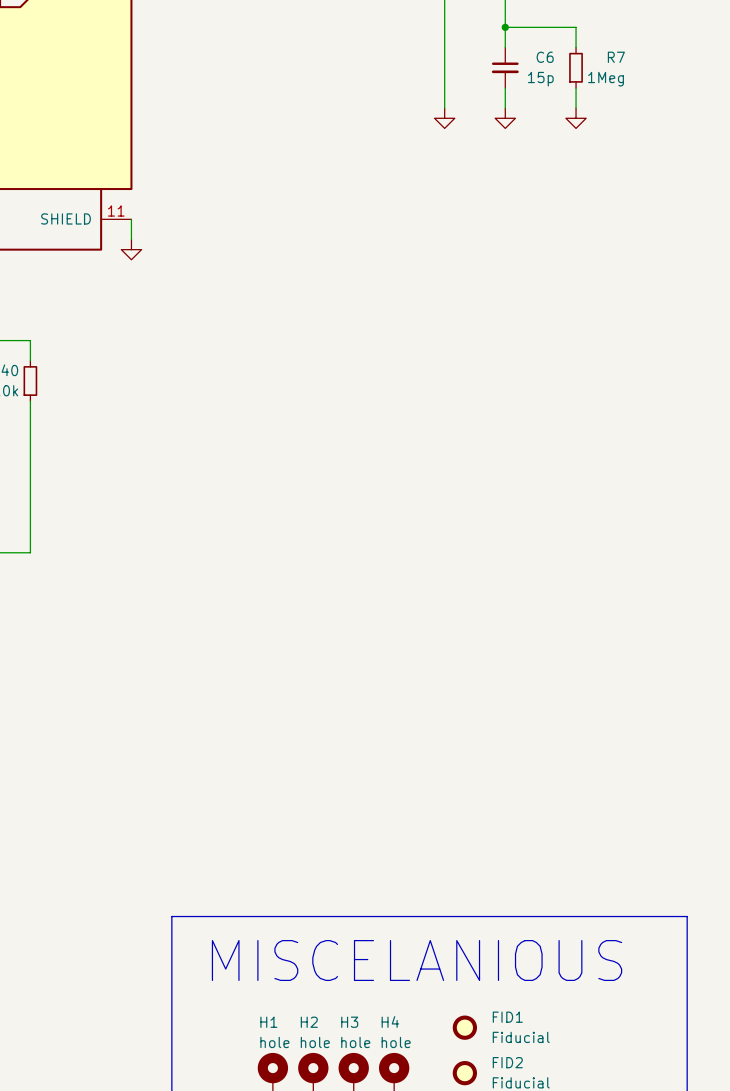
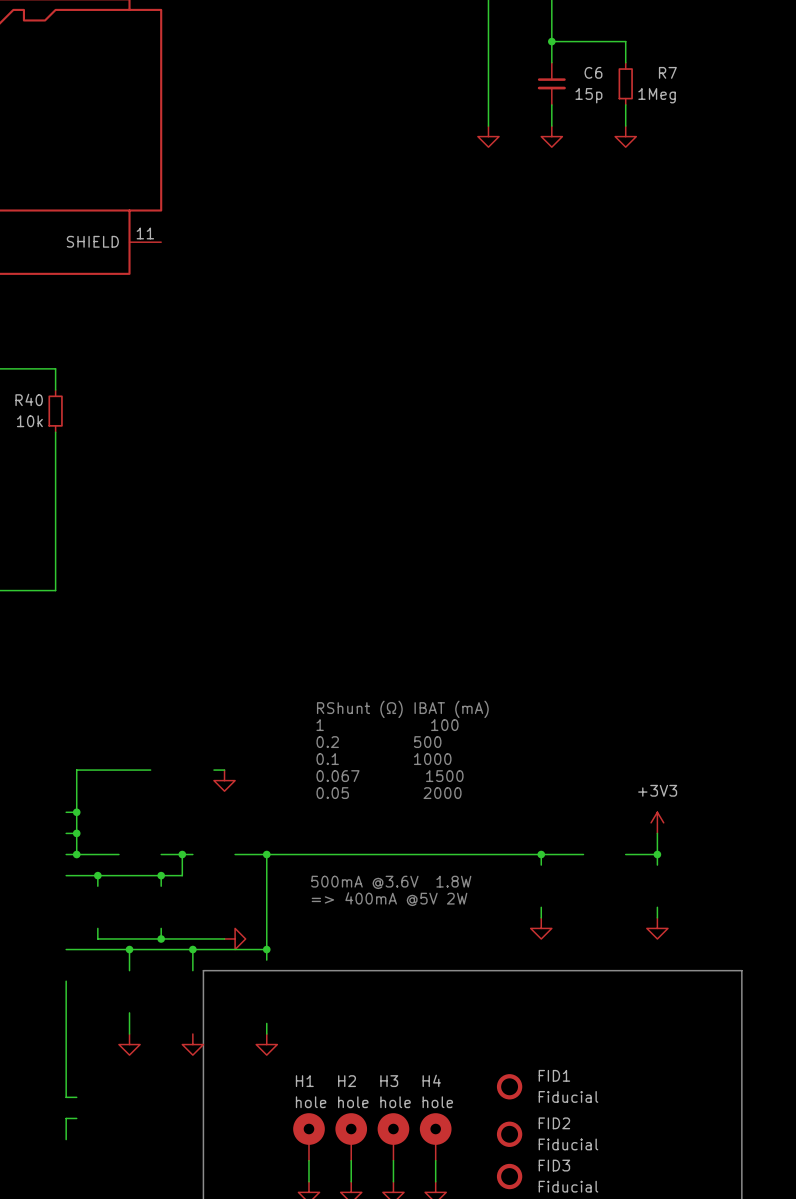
wire: (131, 219) (131, 239) -> none
power symbol: (131, 249) -> none
text: none -> RShunt (Ω) IBAT (mA) (402, 709)
text: none -> 1 100 (387, 725)
text: none -> 0.2 500 (378, 742)
text: none -> 0.1 1000 (383, 759)
wire: none -> (150, 770) (76, 770) (76, 854)
wire: none -> (213, 770) (224, 770)
text: none -> 0.067 1500 (390, 776)
power symbol: none -> (224, 780)
text: none -> 0.05 2000 (389, 793)
wire: none -> (66, 812) (76, 812)
junction: none -> (76, 812)
power symbol: none -> +3V3 (657, 822)
wire: none -> (66, 833) (76, 833)
junction: none -> (76, 833)
wire: none -> (657, 833) (657, 865)
wire: none -> (66, 854) (118, 854)
junction: none -> (76, 854)
wire: none -> (161, 854) (192, 854)
wire: none -> (182, 854) (182, 875) (66, 875)
junction: none -> (182, 854)
wire: none -> (235, 854) (583, 854)
wire: none -> (266, 854) (266, 960)
junction: none -> (266, 854)
wire: none -> (541, 854) (541, 865)
junction: none -> (541, 854)
wire: none -> (625, 854) (657, 854)
junction: none -> (657, 854)
wire: none -> (97, 875) (97, 886)
junction: none -> (97, 875)
wire: none -> (161, 875) (161, 886)
junction: none -> (161, 875)
text: none -> 500mA @3.6V 1.8W (391, 882)
text: none -> => 400mA @5V 2W (389, 899)
wire: none -> (541, 907) (541, 917)
wire: none -> (657, 907) (657, 917)
wire: none -> (97, 928) (97, 938) (224, 938)
wire: none -> (161, 928) (161, 938)
power symbol: none -> (541, 928)
power symbol: none -> (657, 928)
junction: none -> (161, 938)
power symbol: none -> (235, 938)
wire: none -> (66, 949) (266, 949)
wire: none -> (129, 949) (129, 970)
junction: none -> (129, 949)
wire: none -> (192, 949) (192, 970)
junction: none -> (192, 949)
junction: none -> (266, 949)
wire: none -> (66, 981) (66, 1097) (76, 1097)
wire: none -> (129, 1012) (129, 1034)
text: MISCELANIOUS (417, 960) -> none
wire: none -> (266, 1023) (266, 1034)
power symbol: none -> (129, 1044)
power symbol: none -> (192, 1044)
power symbol: none -> (266, 1044)
wire: none -> (76, 1118) (66, 1118) (66, 1139)

